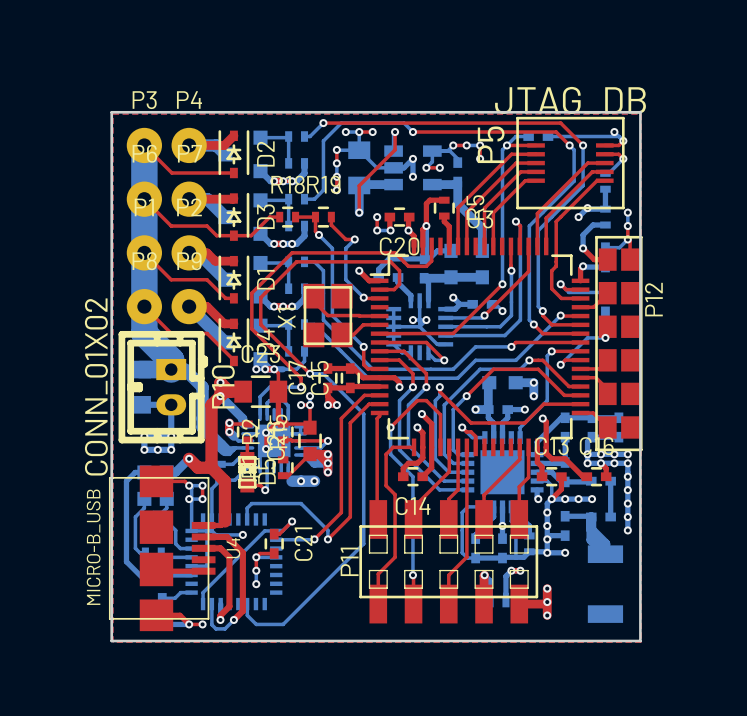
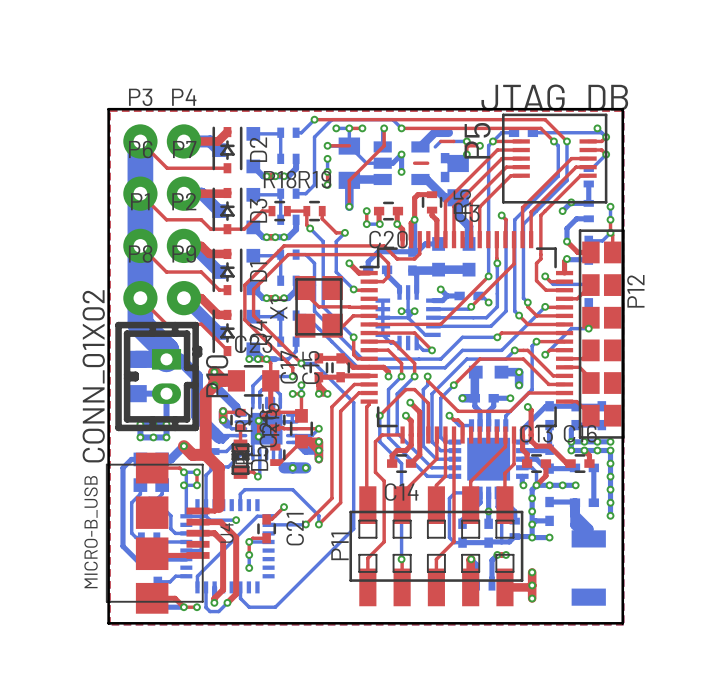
bottom track: none -> (448, 132) (434, 132) (420, 146)
via: (453, 145) -> none
via: (466, 145) -> none
top track: (336, 149) (336, 163) -> (327, 145) (349, 145)
top track: none -> (466, 145) (479, 145)
via: none -> (479, 145)
bottom track: (457, 162) (457, 158) (449, 151) (432, 151) (432, 161) (426, 167) -> none
via: (426, 167) -> none
via: (439, 167) -> none
bottom track: (438, 184) (455, 184) (457, 182) (457, 203) (482, 228) (482, 232) -> (426, 179) (444, 197) (458, 197) (458, 215) (469, 226)
part: none -> (458, 180)

